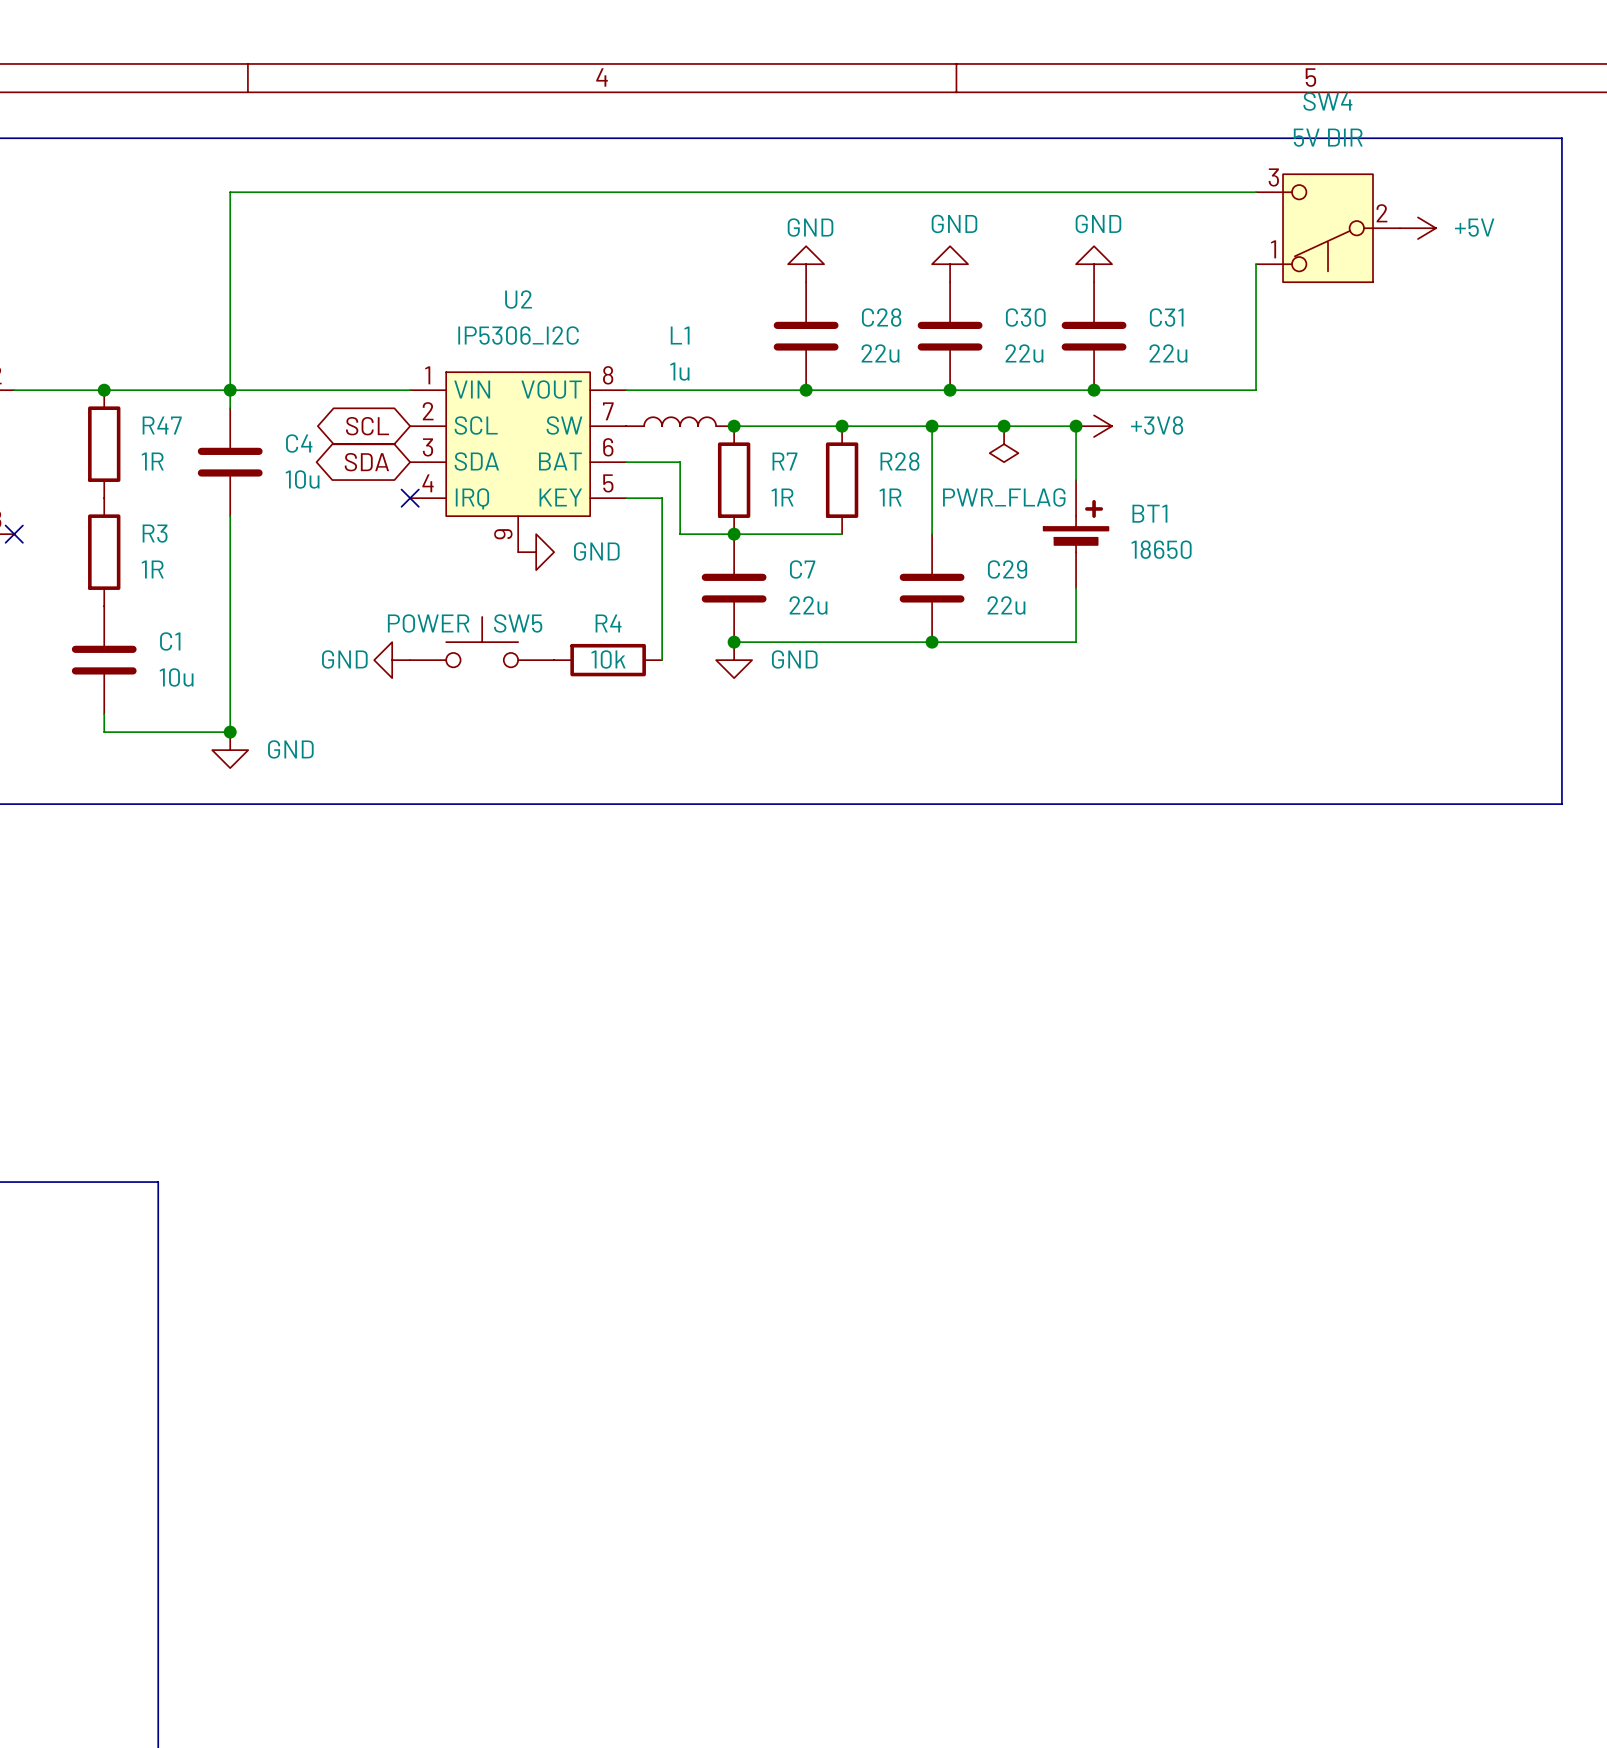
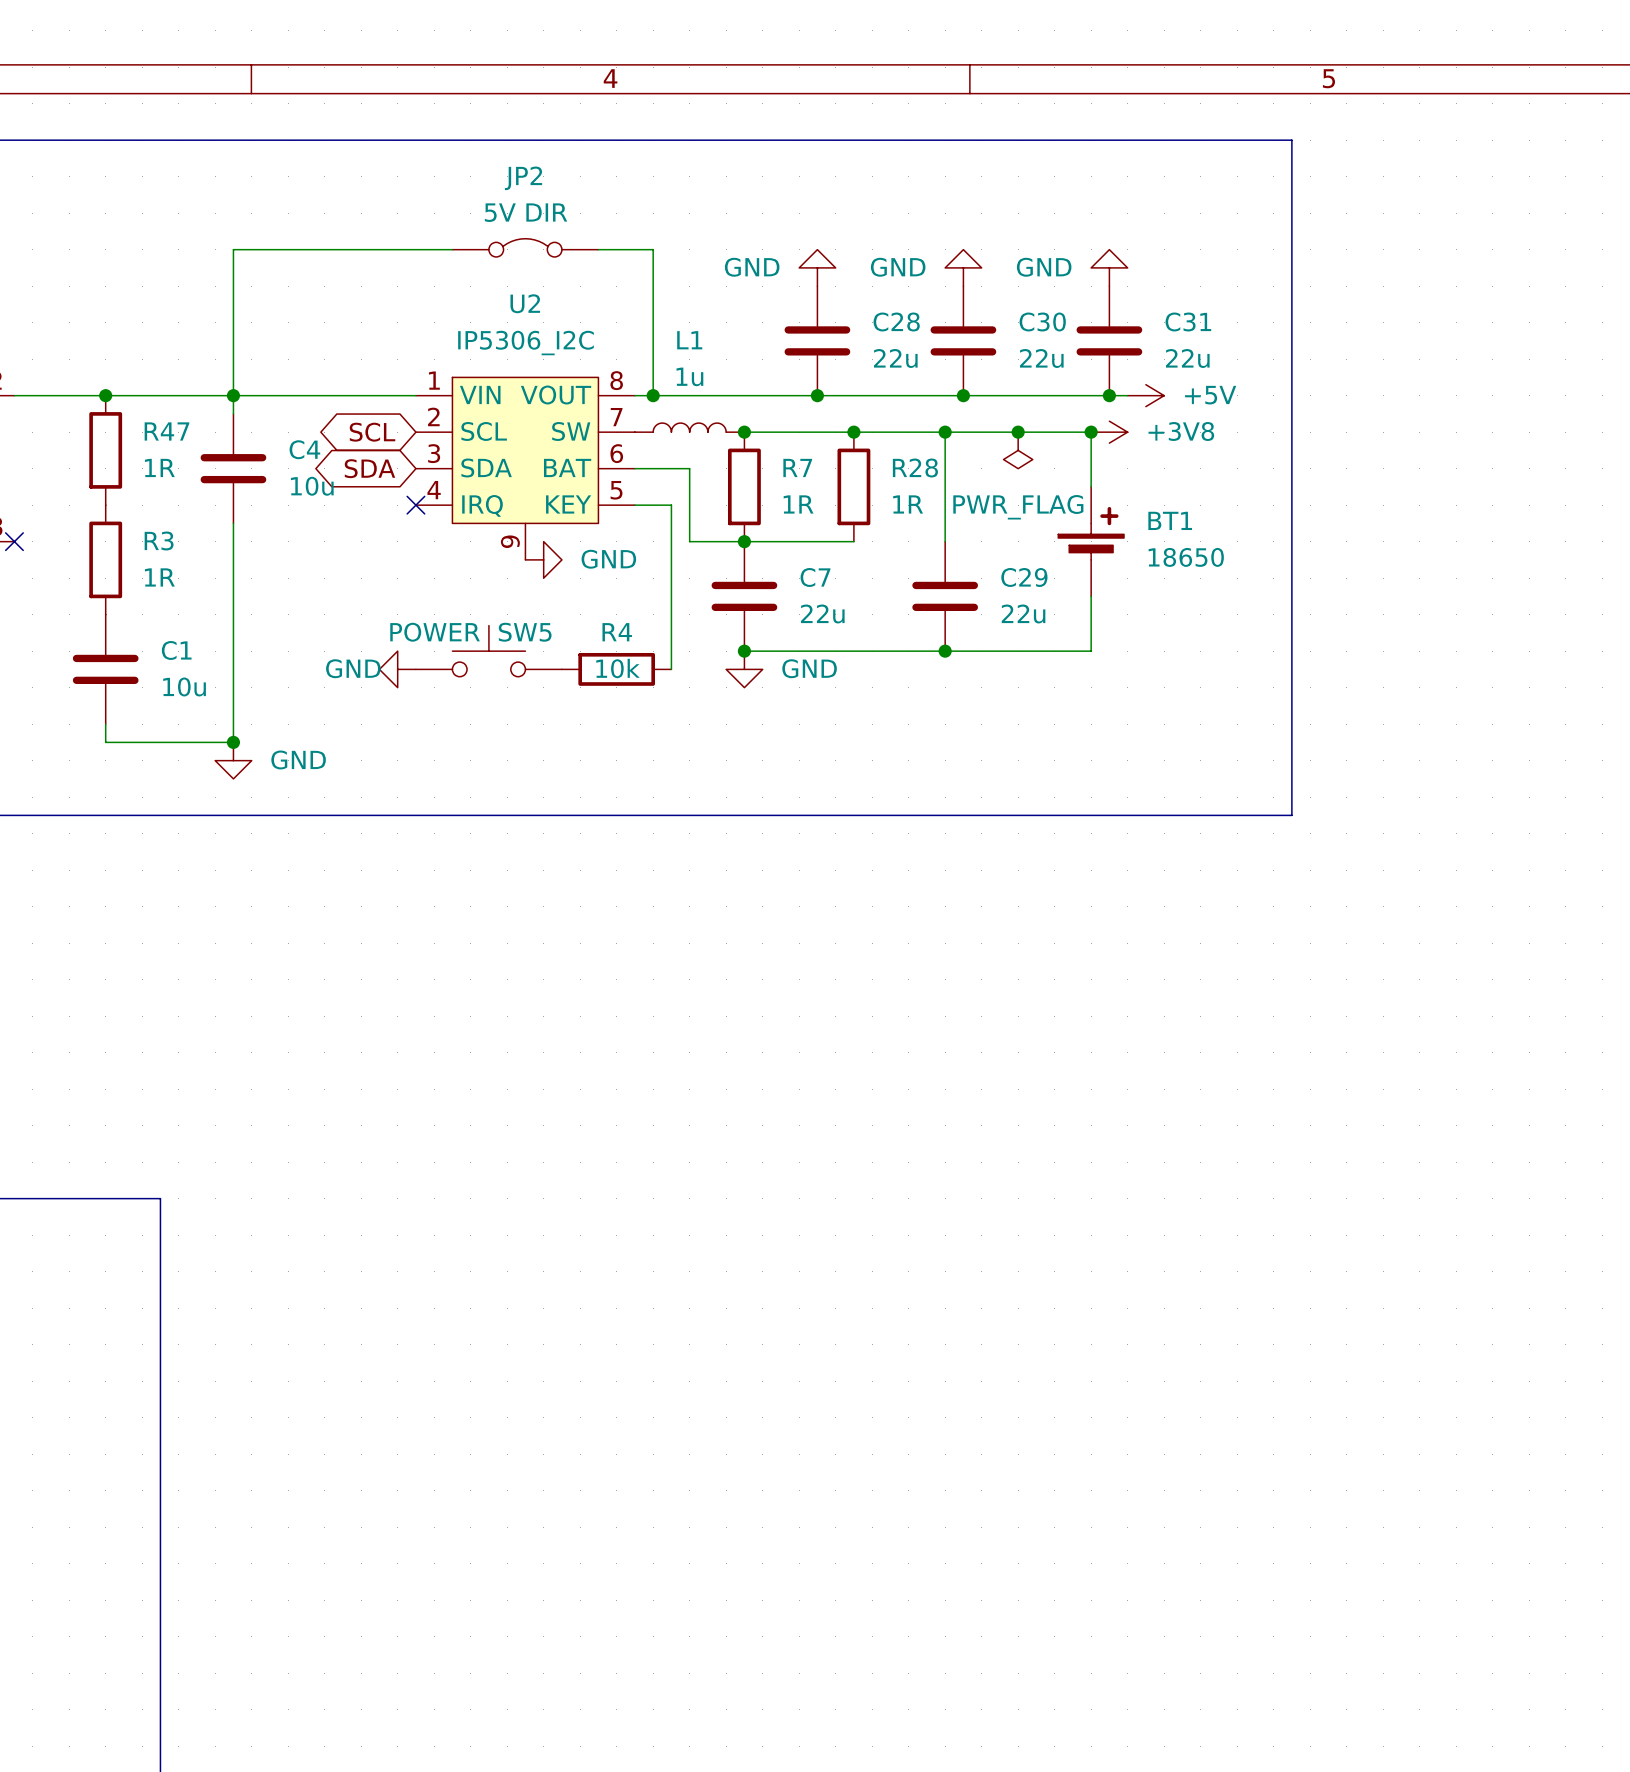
line: (1274, 138) (1561, 138) (1561, 804) (1274, 804) -> (1291, 140) (1291, 815)
wire: (1256, 192) (230, 192) (230, 246) -> (452, 249) (233, 249)
power symbol text position: GND (954, 223) -> GND (898, 267)
power symbol text position: GND (1098, 223) -> GND (1044, 267)
power symbol text position: GND (810, 227) -> GND (752, 267)
SW4: 5V DIR (1328, 228) -> none
power symbol position: +5V (1417, 228) -> +5V (1145, 395)
JP2: none -> 5V DIR (525, 247)
wire: none -> (598, 249) (653, 249) (653, 395)
wire: (1256, 264) (1256, 390) (1112, 390) -> none
junction: none -> (653, 395)

